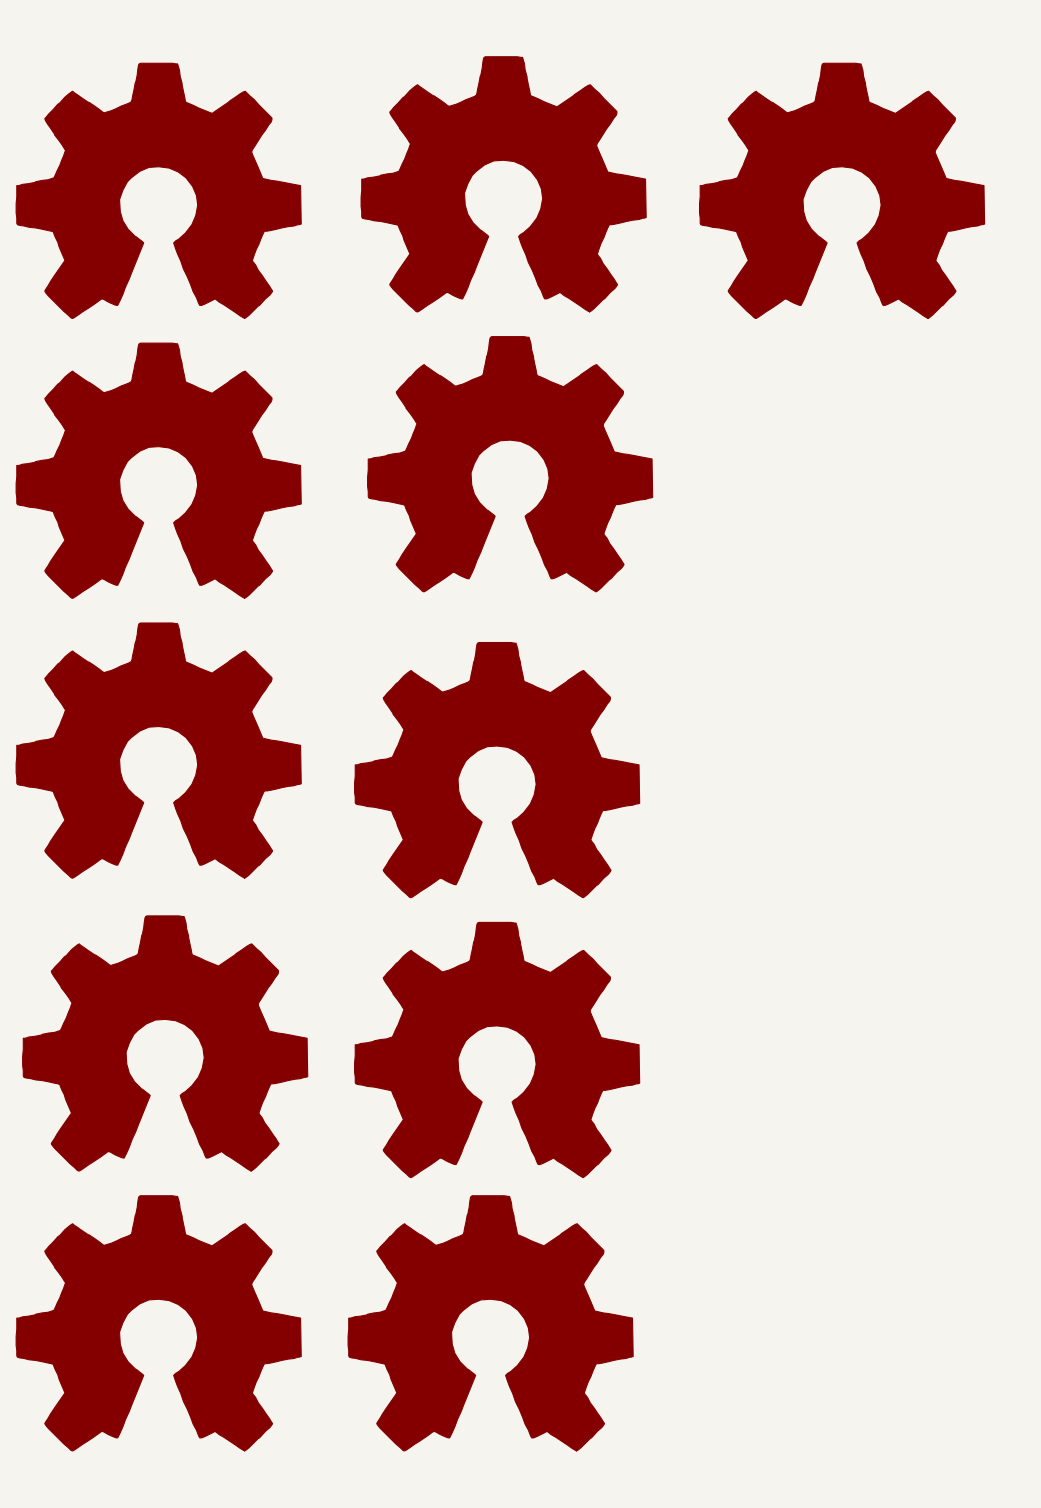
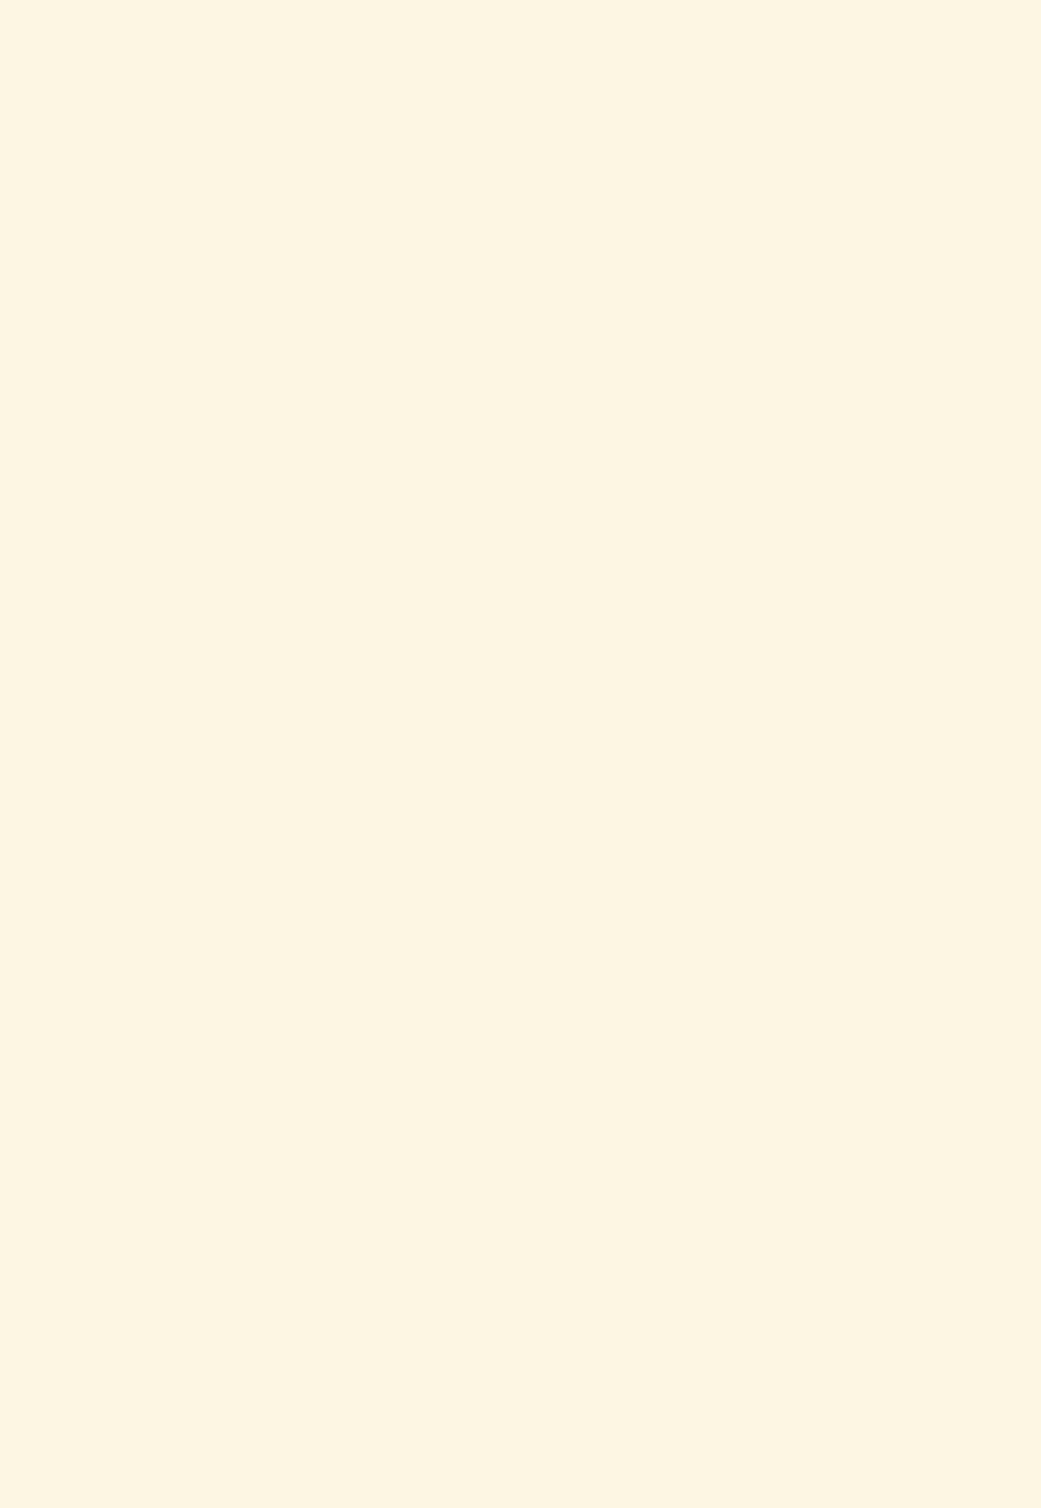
part: (503, 184) -> none
part: (158, 190) -> none
part: (842, 190) -> none
part: (510, 464) -> none
part: (158, 470) -> none
part: (158, 750) -> none
part: (497, 770) -> none
part: (165, 1043) -> none
part: (497, 1049) -> none
part: (158, 1323) -> none
part: (490, 1323) -> none

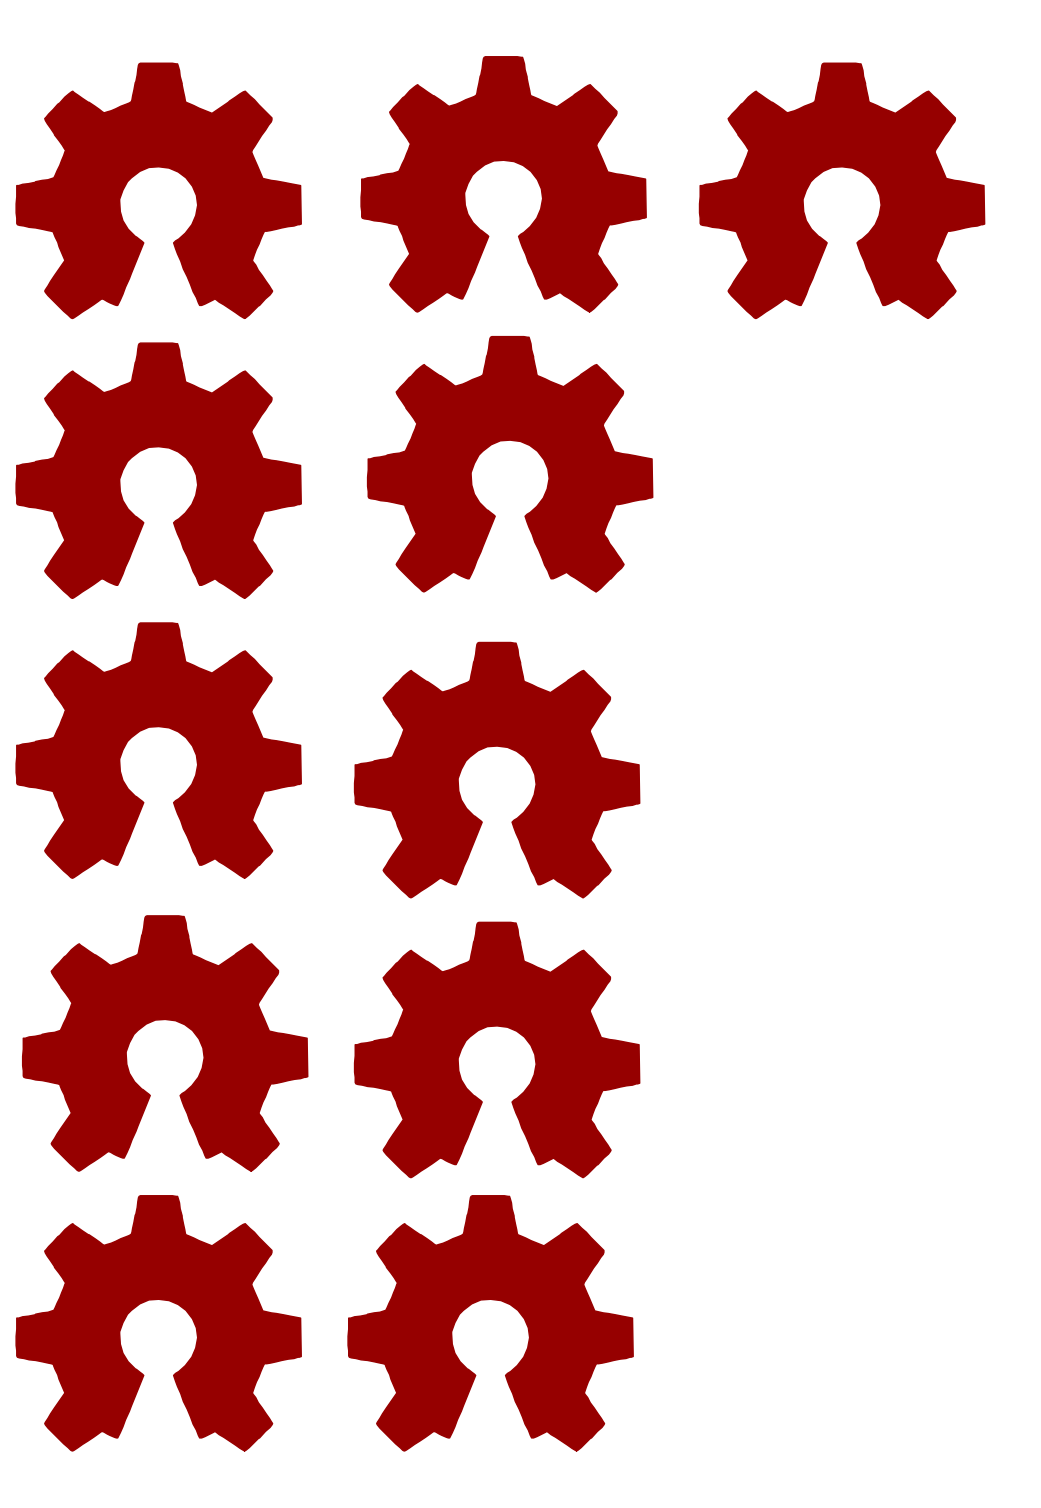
part: none -> (503, 184)
part: none -> (158, 190)
part: none -> (842, 190)
part: none -> (510, 464)
part: none -> (158, 470)
part: none -> (158, 750)
part: none -> (497, 770)
part: none -> (165, 1043)
part: none -> (497, 1049)
part: none -> (158, 1323)
part: none -> (490, 1323)

